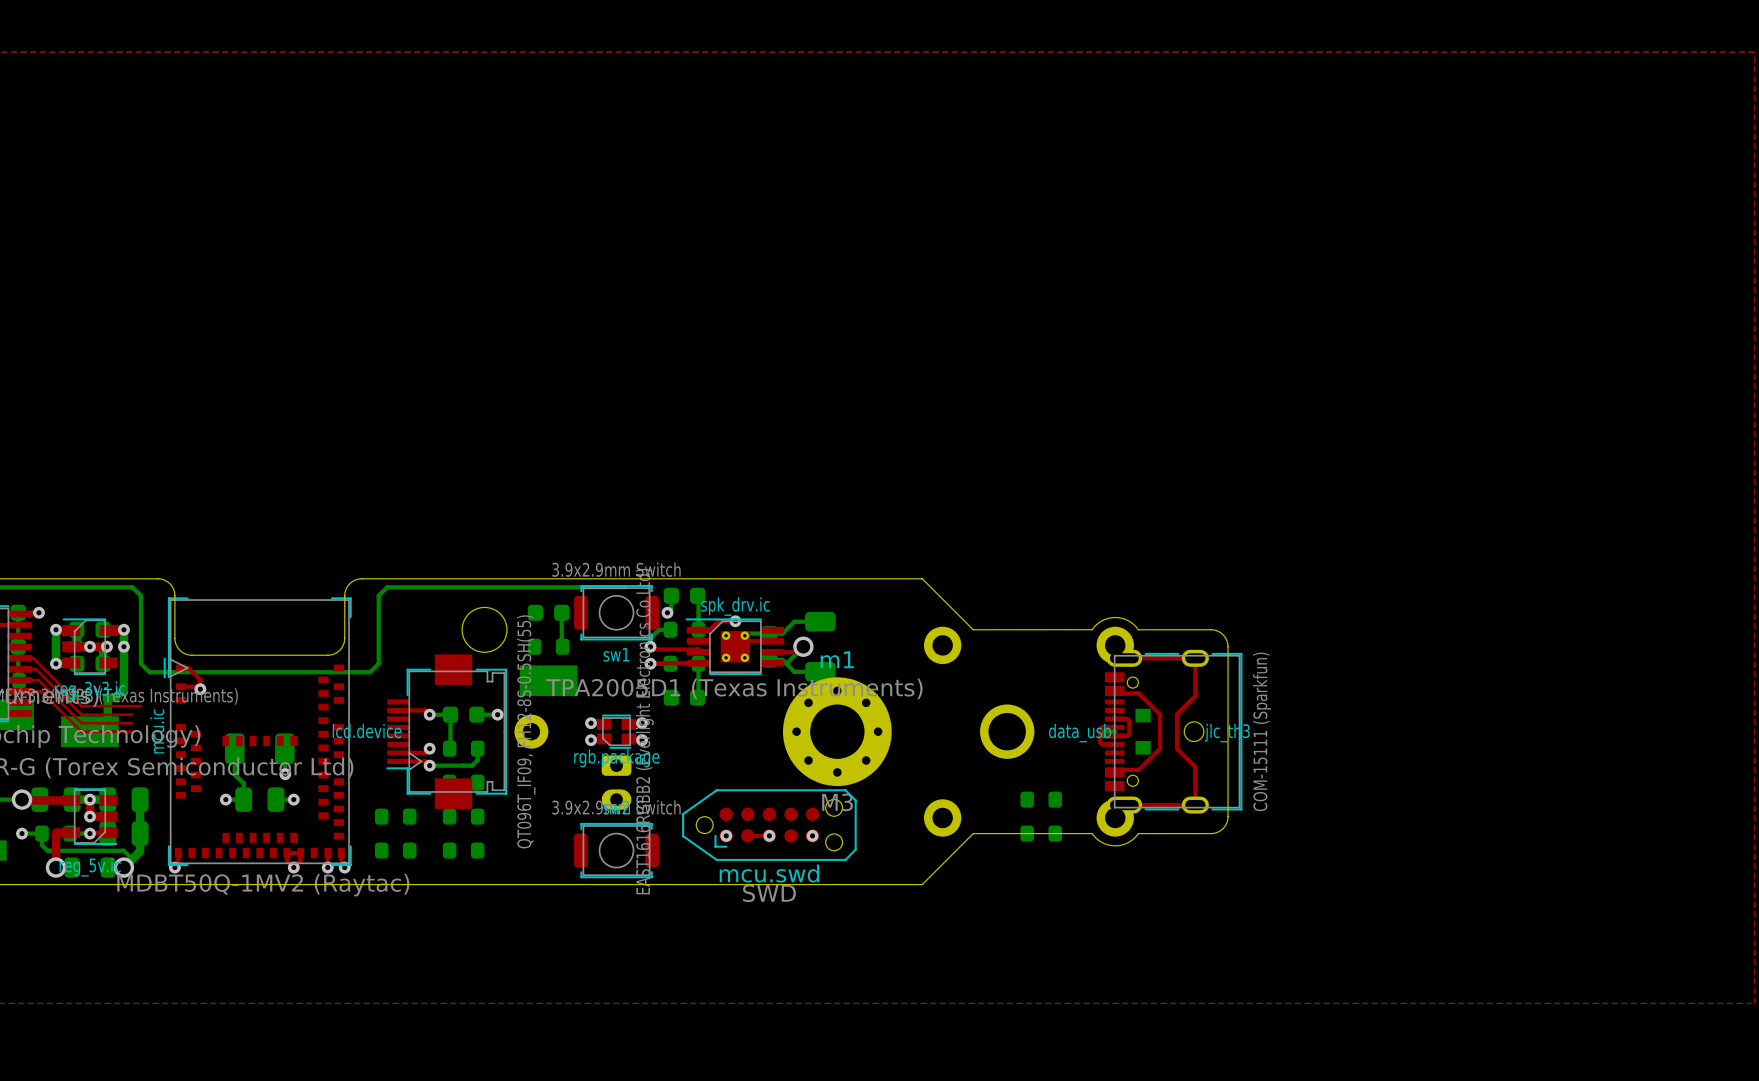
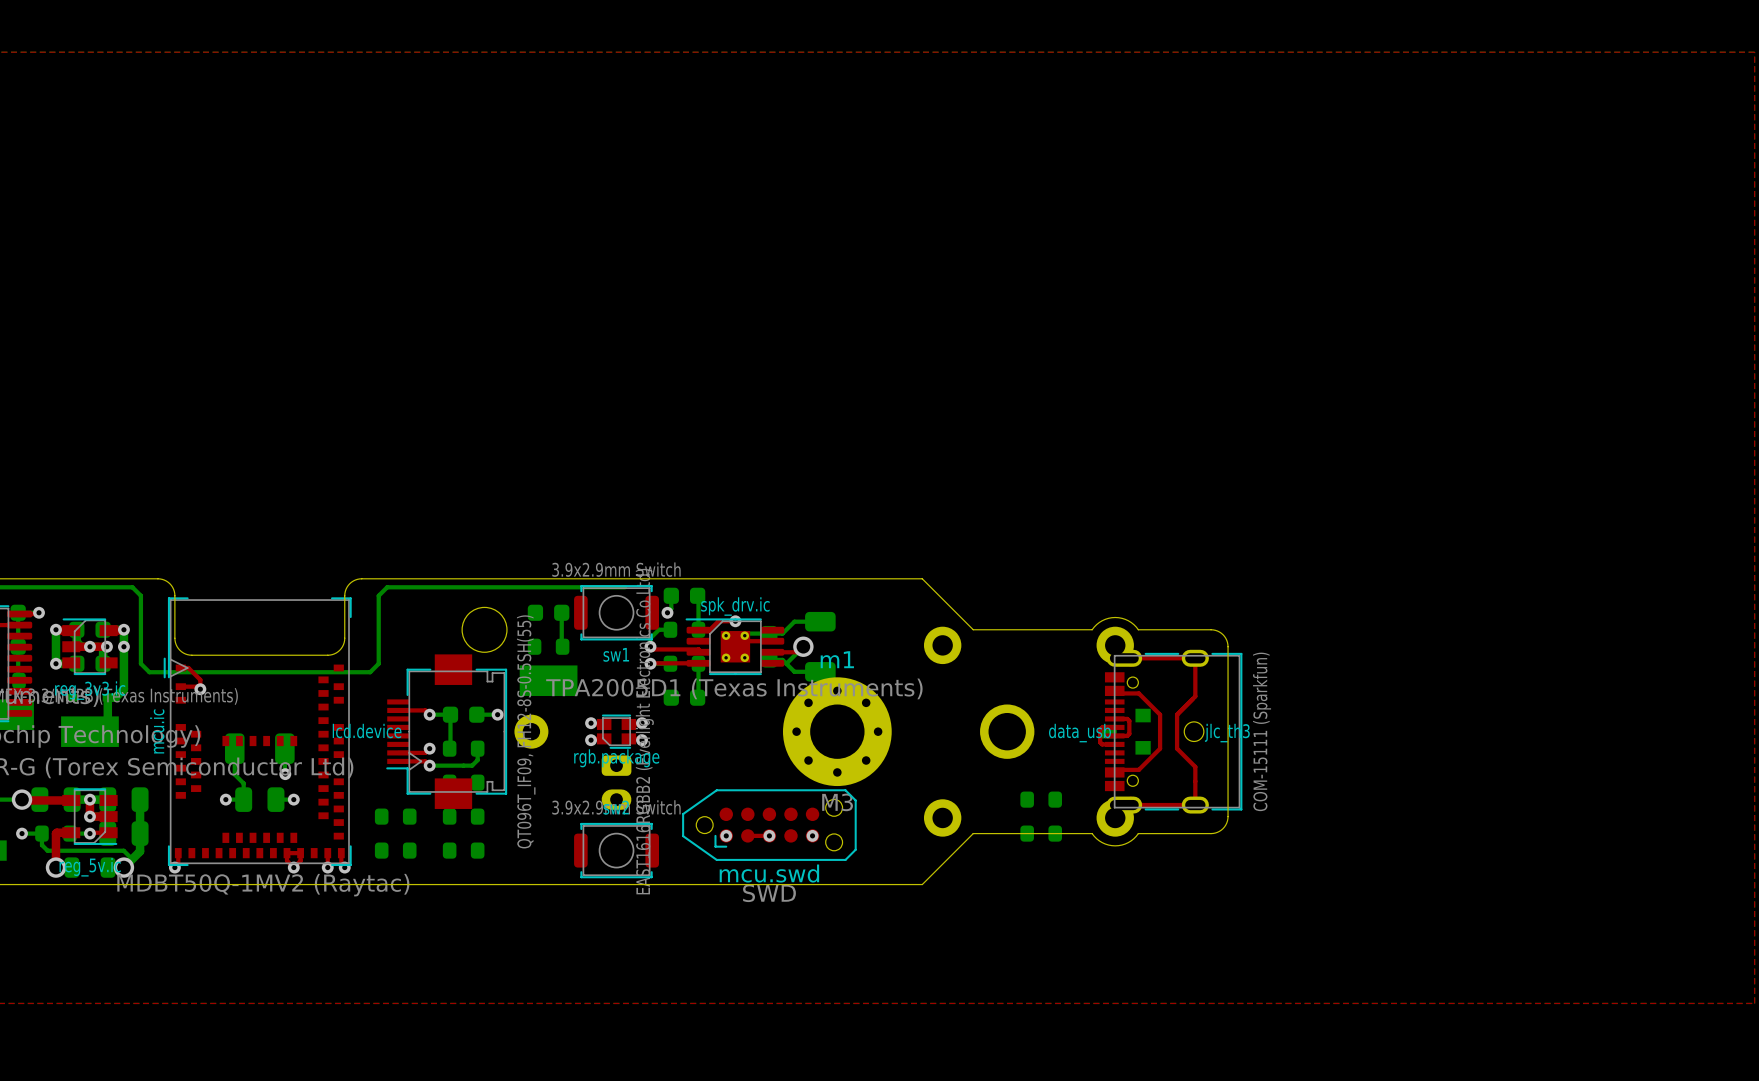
top track: (19, 658) (33, 658) (81, 706) (140, 706) -> none
top track: (19, 669) (36, 669) (81, 714) (132, 714) -> none
top track: (19, 680) (38, 680) (81, 723) (132, 723) -> none
top track: (19, 691) (41, 691) (81, 731) (132, 731) -> none

